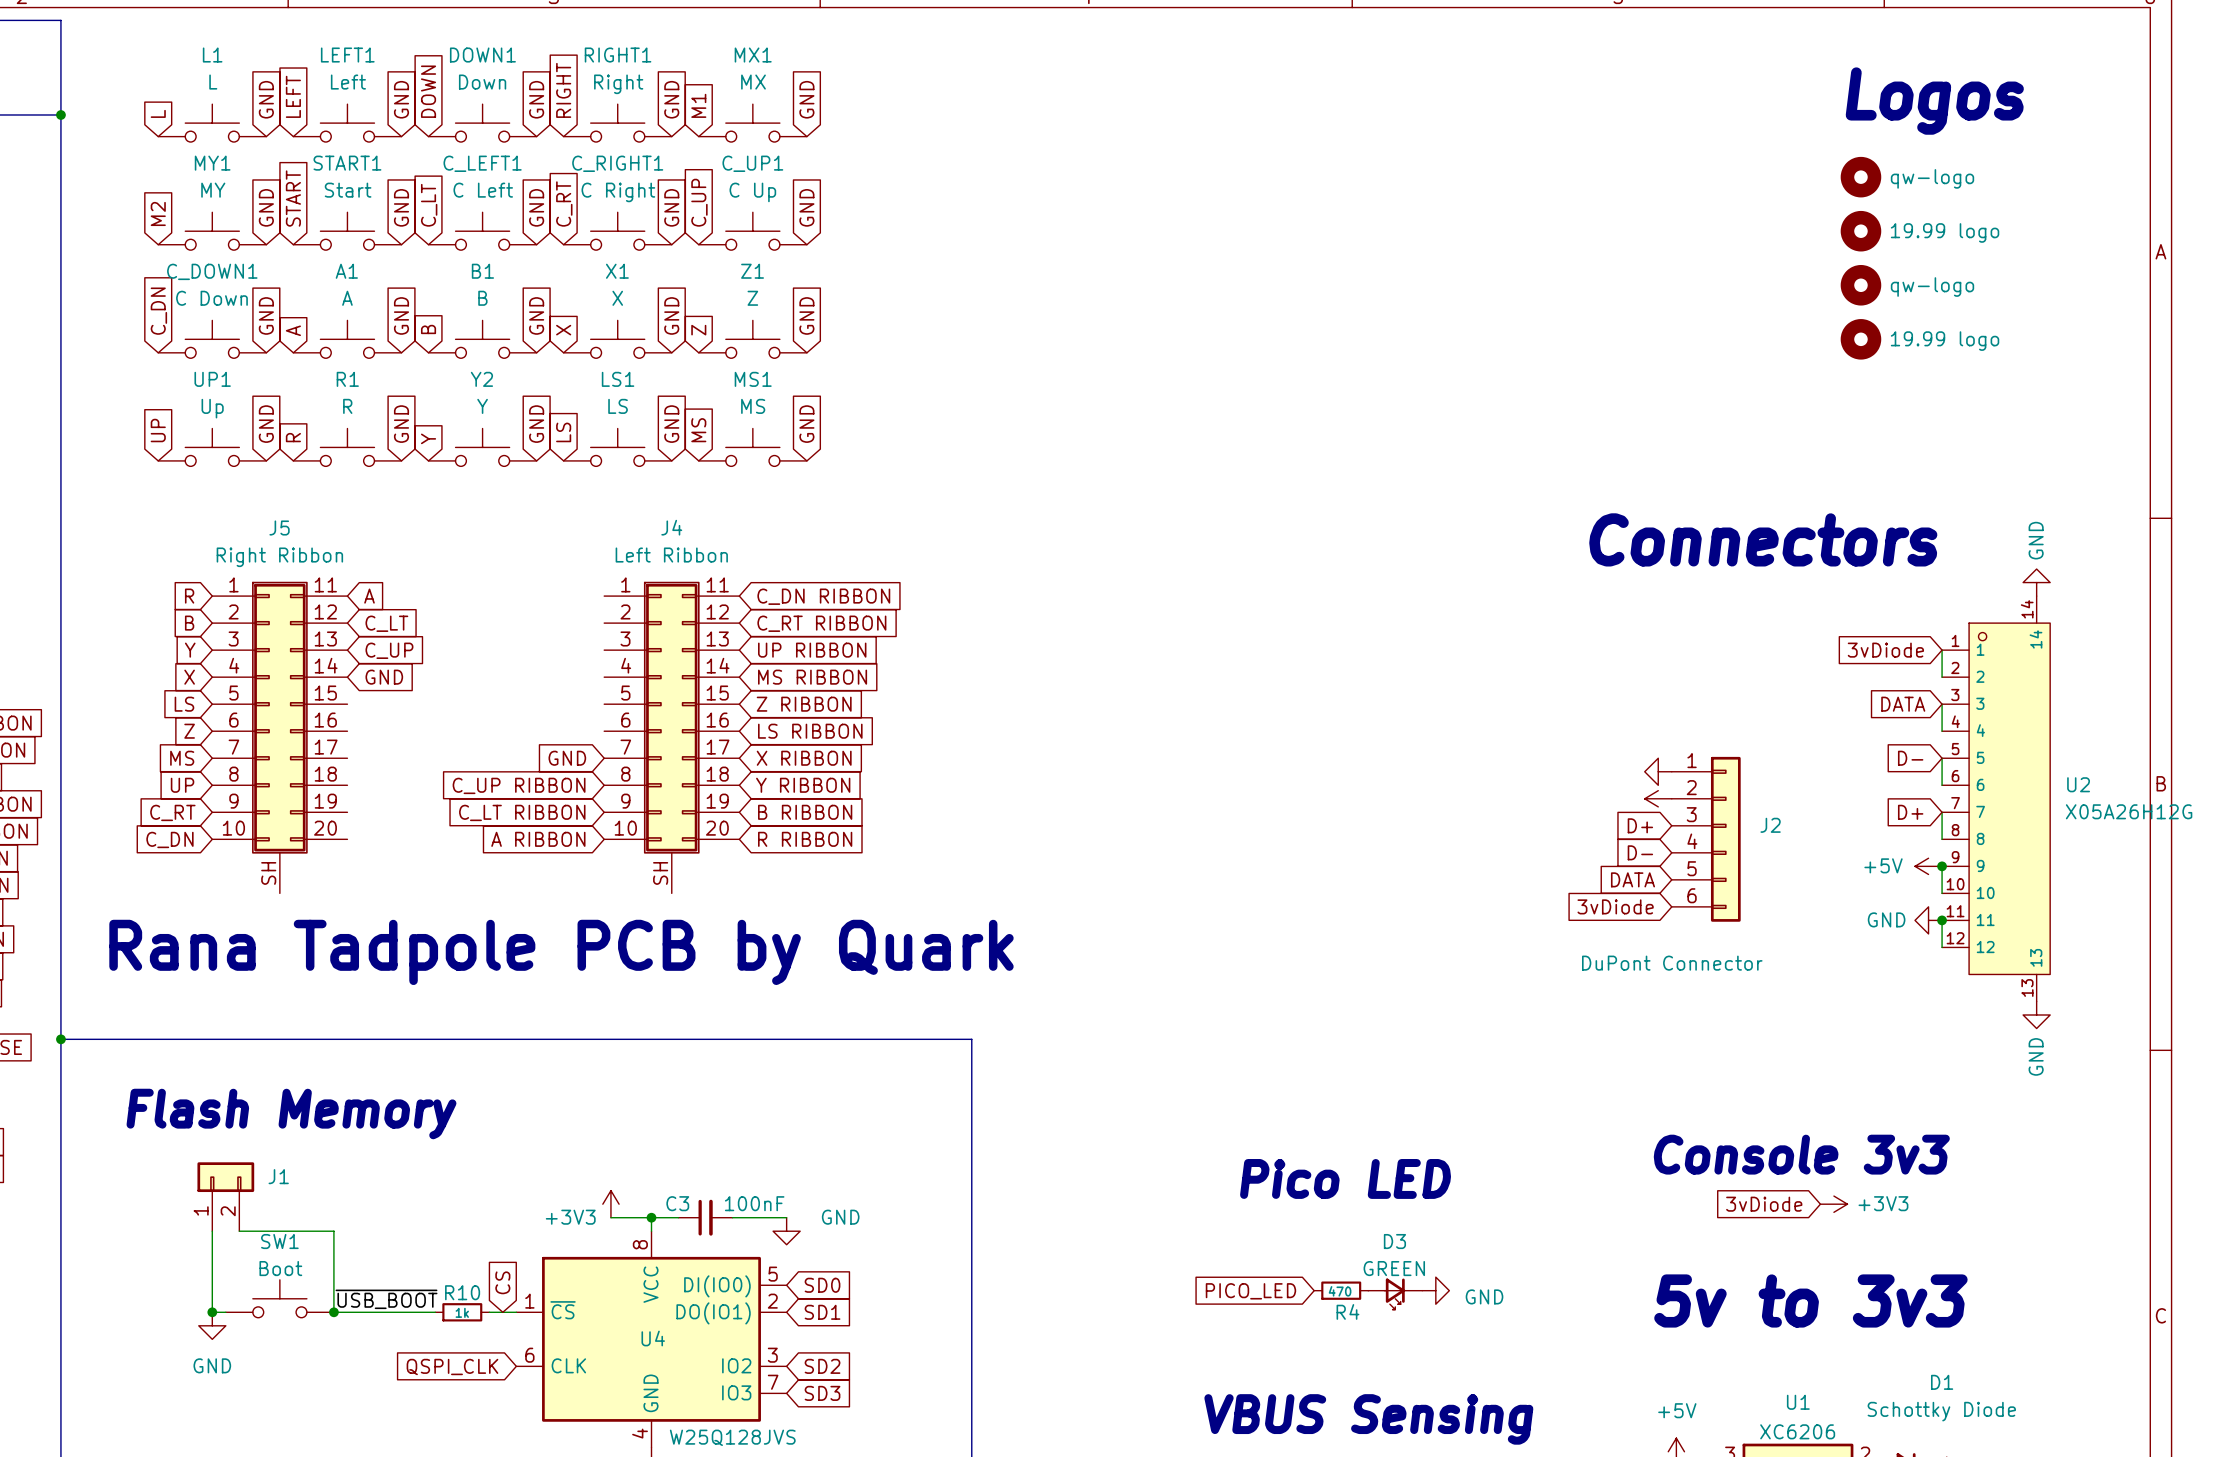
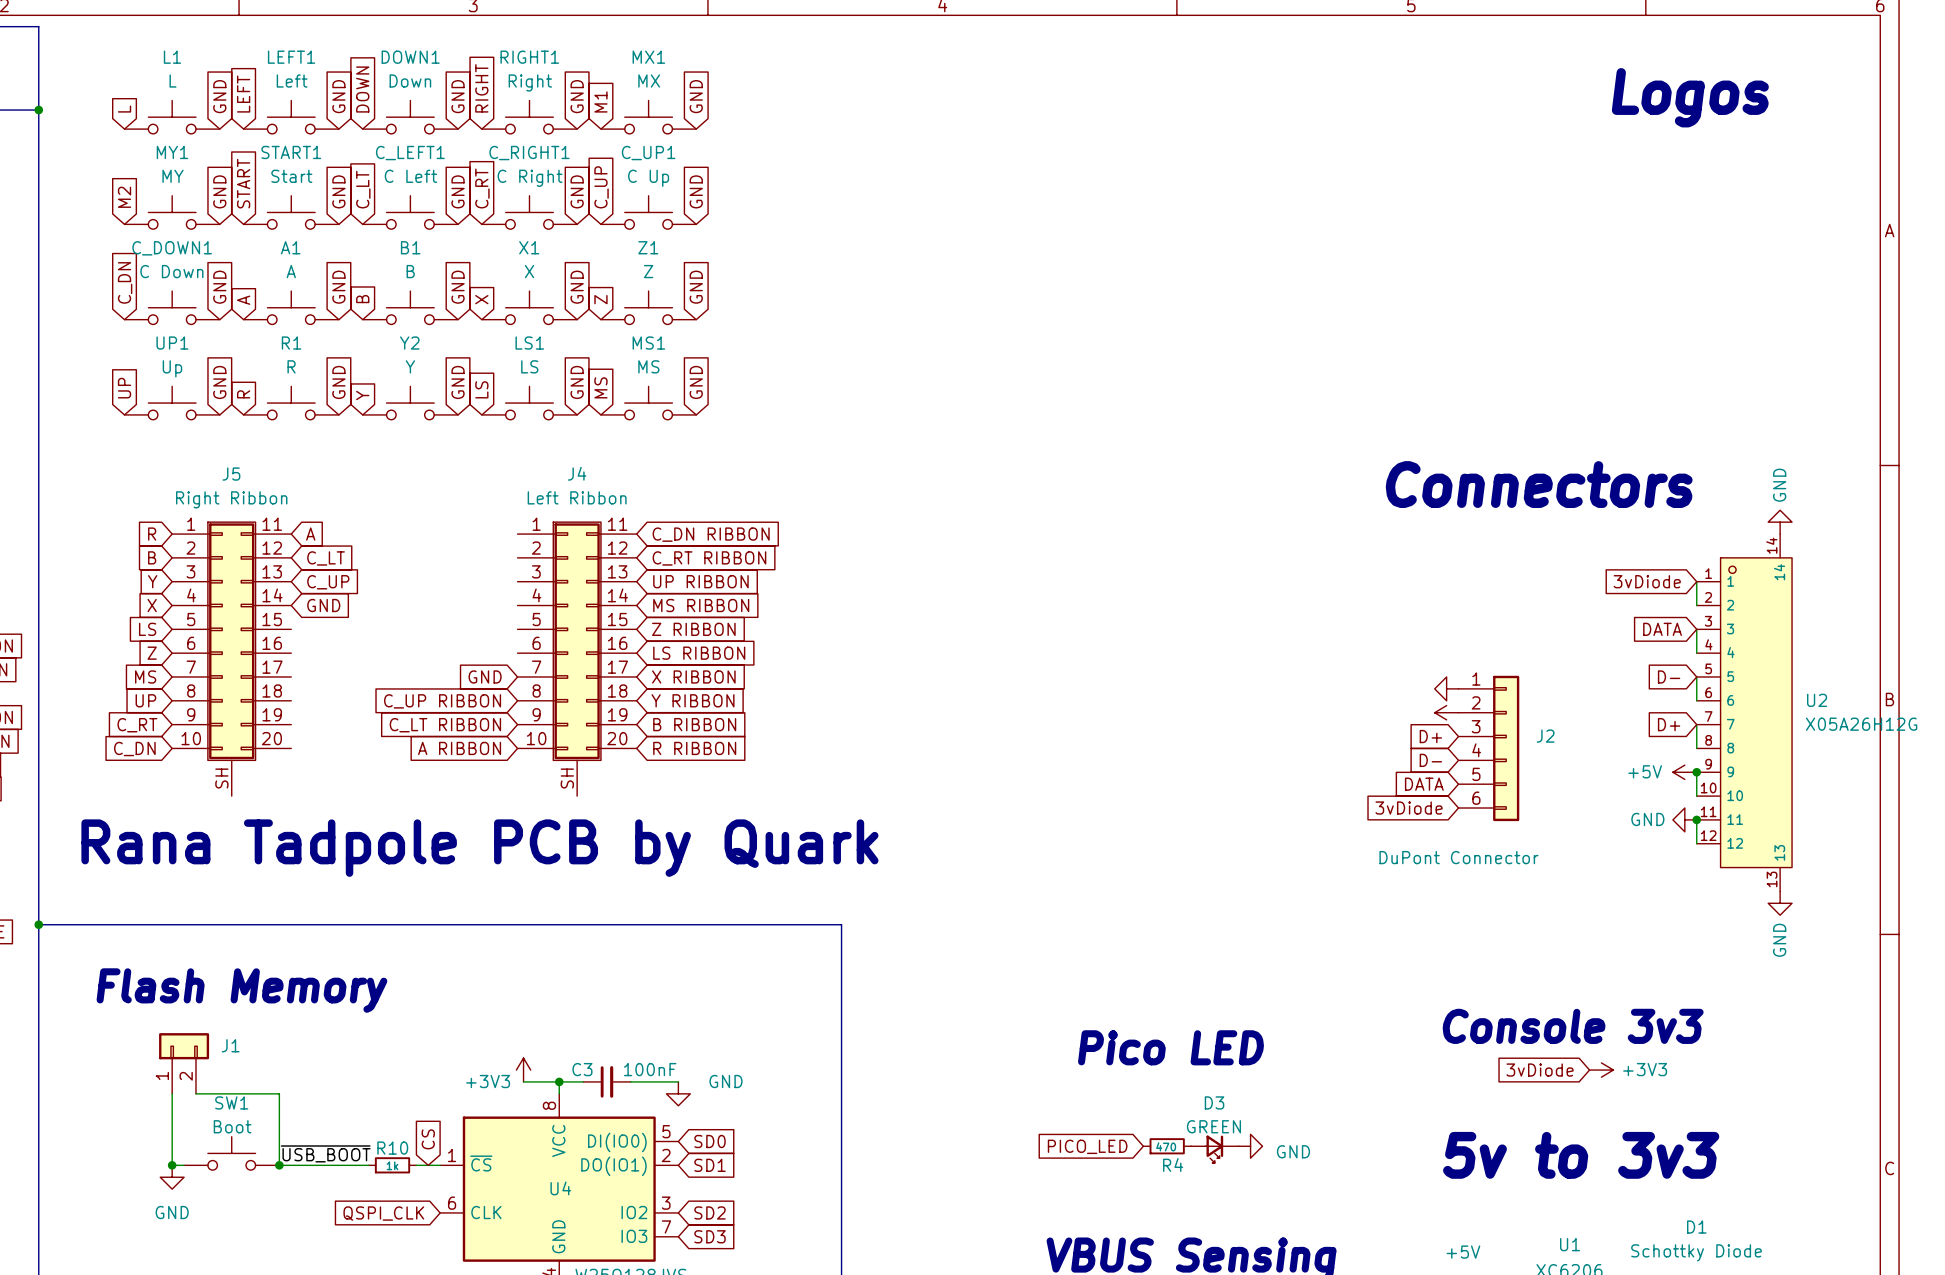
part: qw-logo (1860, 177) -> none
part: 19.99 logo (1860, 231) -> none
part: qw-logo (1860, 285) -> none
part: 19.99 logo (1860, 339) -> none

